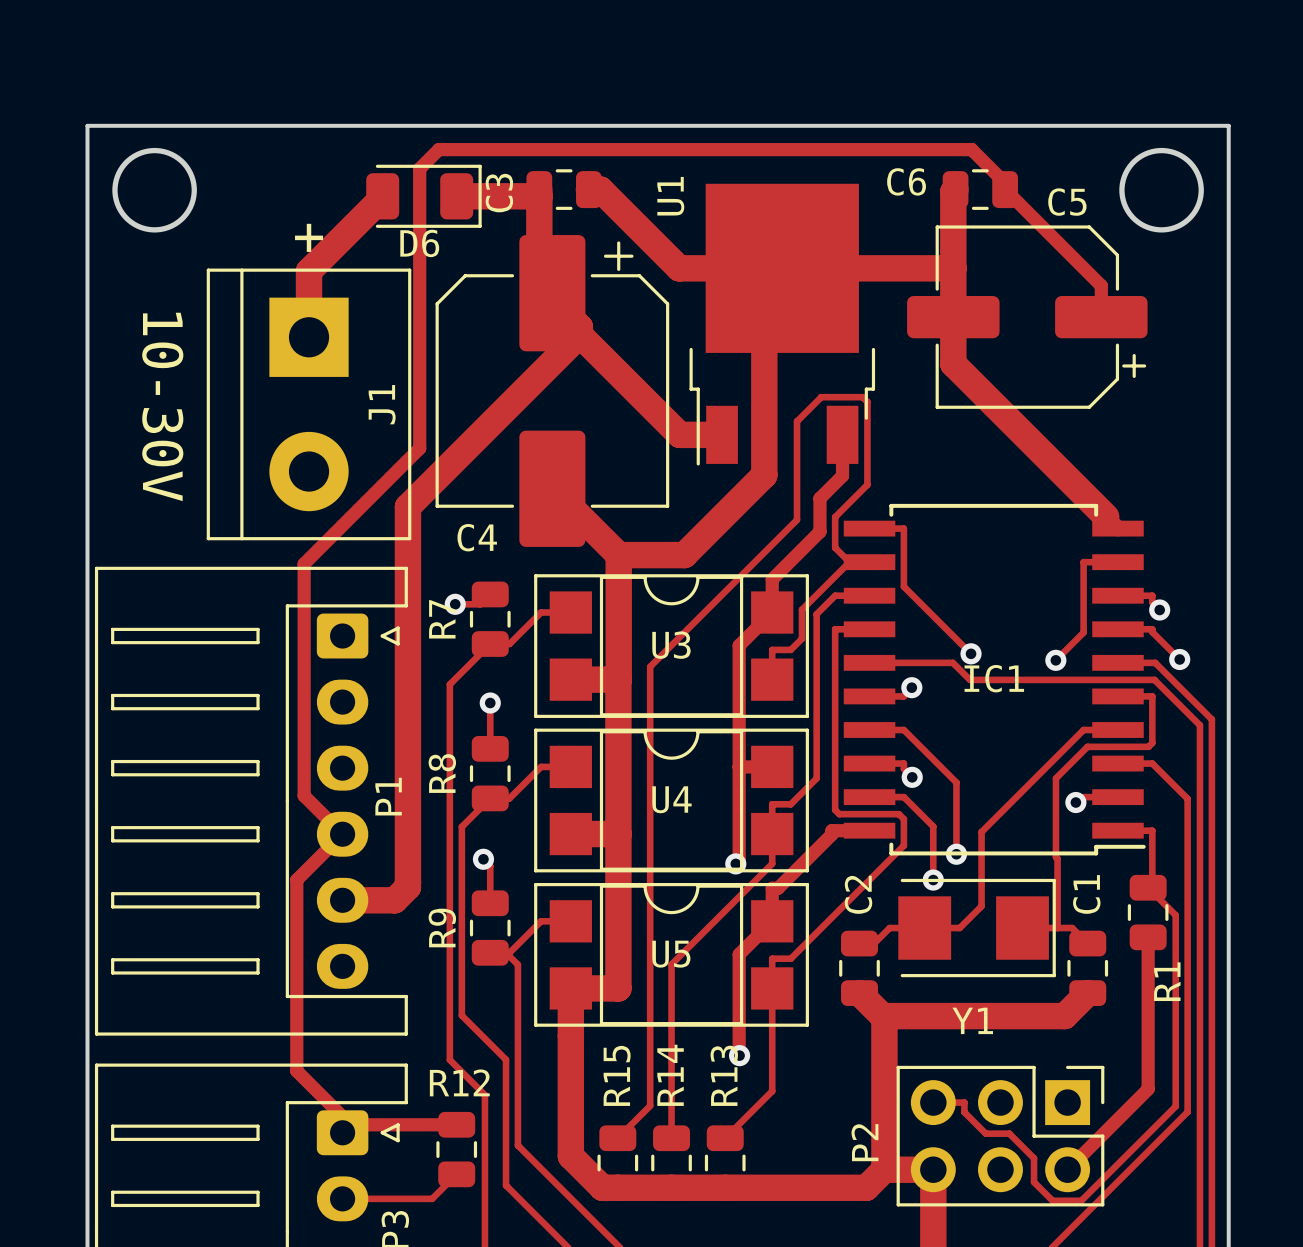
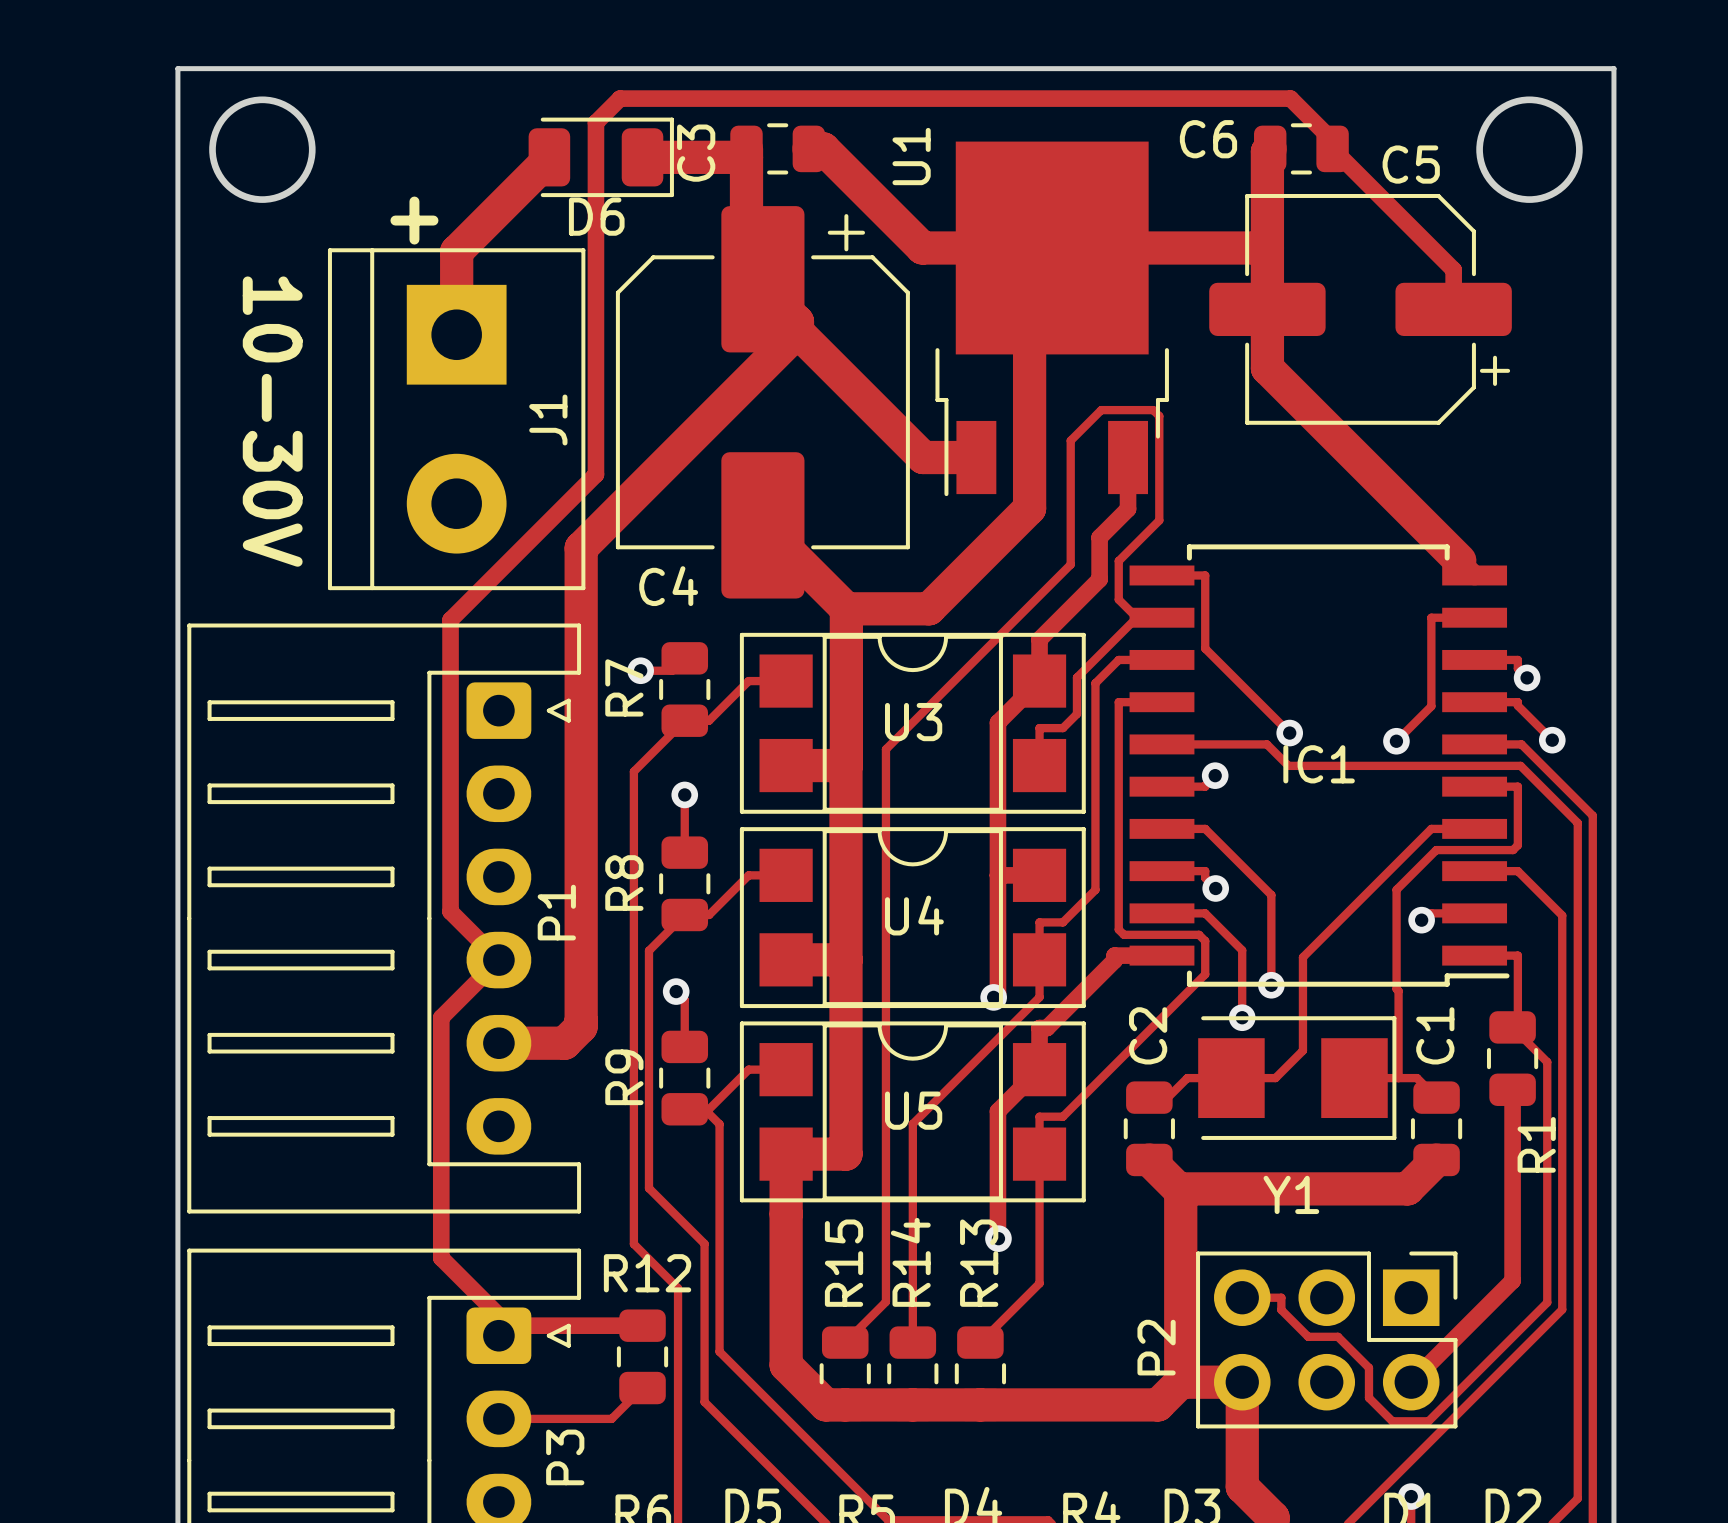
text position: + (309, 237) -> + (414, 220)

